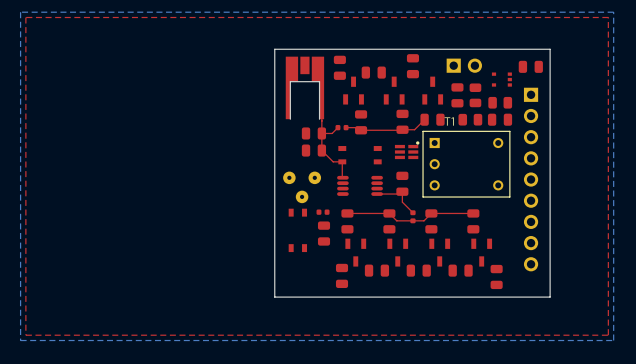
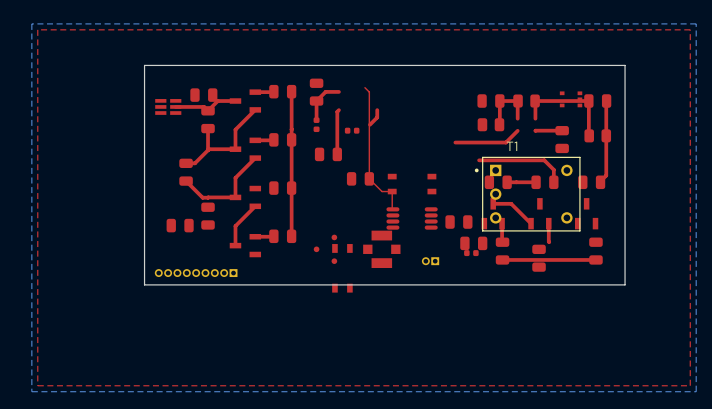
board edge: (274, 49) (274, 297) (550, 297) (550, 245) -> (316, 65) (144, 65) (144, 284) (625, 284)
part: (464, 65) -> none
part: (412, 66) -> none
part position: (530, 66) -> (597, 101)
part: (339, 67) -> none
top track: none -> (273, 91) (255, 92)
part: none -> (282, 91)
top track: none -> (291, 91) (291, 236)
top track: none -> (338, 91) (325, 91) (316, 101) (316, 120)
part: (373, 72) -> none
part: none -> (316, 92)
part: none -> (203, 95)
top track: none -> (235, 101) (217, 101) (208, 110) (204, 106) (175, 106)
part: none -> (245, 101)
part: none -> (490, 101)
top track: none -> (606, 101) (606, 175) (600, 182)
part: none -> (168, 106)
top track: none -> (255, 109) (235, 129) (235, 149) (209, 149) (194, 163) (186, 163)
part: (304, 88) -> none
top track: none -> (338, 110) (337, 111) (337, 154)
top track: none -> (377, 110) (377, 117) (369, 124)
part: (353, 90) -> none
part: (394, 90) -> none
part: (432, 90) -> none
part: (457, 95) -> none
part rotation: 0° (475, 95) -> 90° clockwise (526, 101)
part position: (475, 95) -> (526, 101)
top track: none -> (517, 118) (518, 101) (499, 101) (499, 124)
top track: none -> (535, 118) (535, 101) (588, 101) (589, 135)
part: none -> (208, 119)
part: none -> (316, 124)
part: none -> (490, 124)
part: (500, 102) -> none
top track: none -> (208, 128) (208, 150)
part: none -> (352, 130)
top track: none -> (517, 130) (505, 142) (455, 142)
top track: none -> (562, 130) (535, 130)
part: none -> (597, 135)
top track: none -> (273, 139) (255, 140)
part: none -> (282, 139)
top track: (424, 119) (414, 129) (361, 130) (358, 127) (346, 127) -> none
part: (432, 119) -> none
part: (470, 119) -> none
part rotation: 0° (500, 119) -> 90° clockwise (562, 139)
part: (402, 121) -> none
part: (361, 122) -> none
part: none -> (245, 149)
top track: (337, 127) (332, 133) (321, 133) -> none
part: (342, 127) -> none
top track: none -> (255, 158) (235, 177) (235, 197) (202, 197) (186, 181)
part position: (313, 133) -> (328, 154)
top track: none -> (479, 160) (544, 160) (553, 169) (553, 182)
part: none -> (186, 172)
part: (406, 152) -> none
part: none -> (498, 182)
top track: none -> (536, 182) (507, 182)
part: none -> (544, 182)
part: none -> (591, 182)
part: none -> (282, 188)
part: none -> (245, 197)
top track: none -> (493, 203) (511, 203) (531, 223)
top track: none -> (255, 206) (235, 226) (235, 245)
part: (531, 179) -> none
part: none -> (493, 213)
part: none -> (539, 213)
part: none -> (586, 213)
part: none -> (208, 216)
part rotation: 0° (402, 183) -> 90° clockwise (458, 222)
part: (302, 187) -> none
top track: none -> (502, 223) (502, 242)
top track: none -> (548, 223) (549, 242)
part: none -> (180, 225)
top track: (377, 194) (400, 194) (402, 191) (402, 202) (412, 212) -> none
top track: none -> (273, 236) (255, 236)
part: none -> (282, 236)
part: none -> (473, 243)
part: none -> (245, 245)
part: (323, 212) -> none
part: none -> (325, 249)
part: none -> (381, 249)
top track: (473, 213) (431, 213) (423, 220) (396, 220) (389, 213) (347, 213) -> none
part: none -> (502, 251)
part: none -> (595, 251)
part rotation: 0° (412, 216) -> 90° clockwise (471, 253)
part: (347, 221) -> none
part: (389, 221) -> none
part: (431, 221) -> none
top track: none -> (595, 259) (502, 259)
part: none -> (430, 261)
part: (324, 233) -> none
part: none -> (196, 273)
part: (355, 252) -> none
part: (397, 252) -> none
part: (439, 252) -> none
part: (481, 252) -> none
part: (376, 270) -> none
part: (418, 270) -> none
part: (460, 270) -> none
part: (342, 275) -> none
part: (496, 276) -> none

